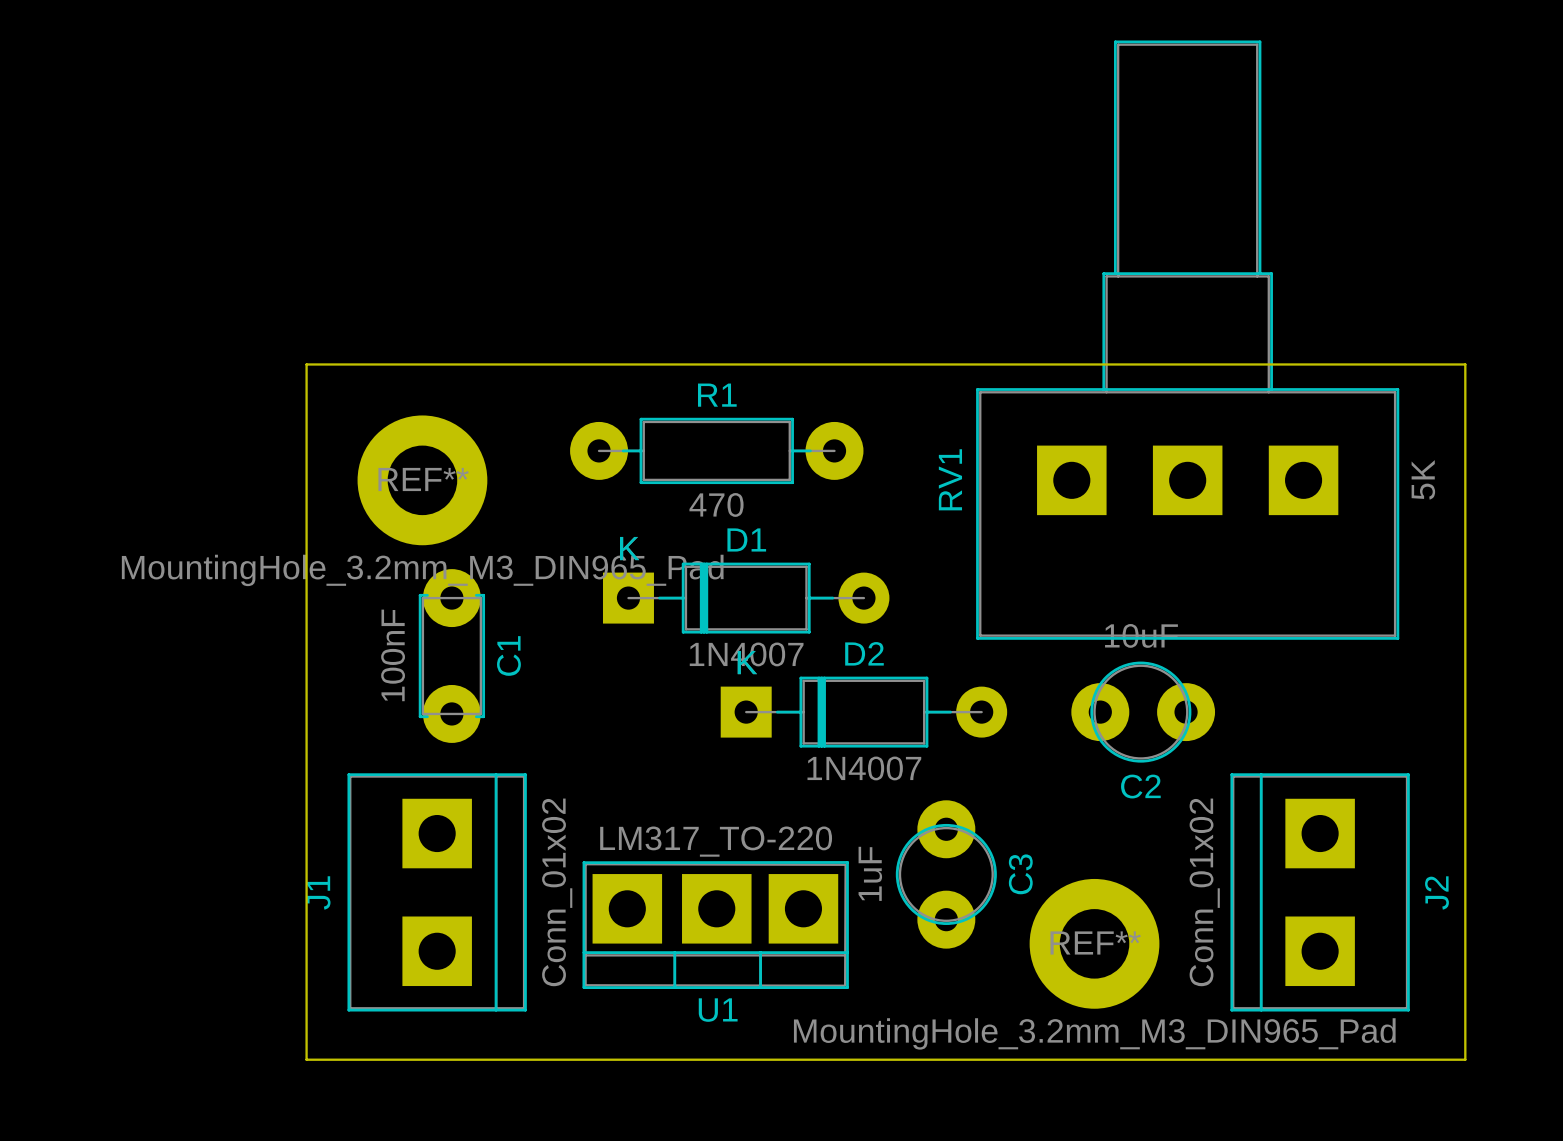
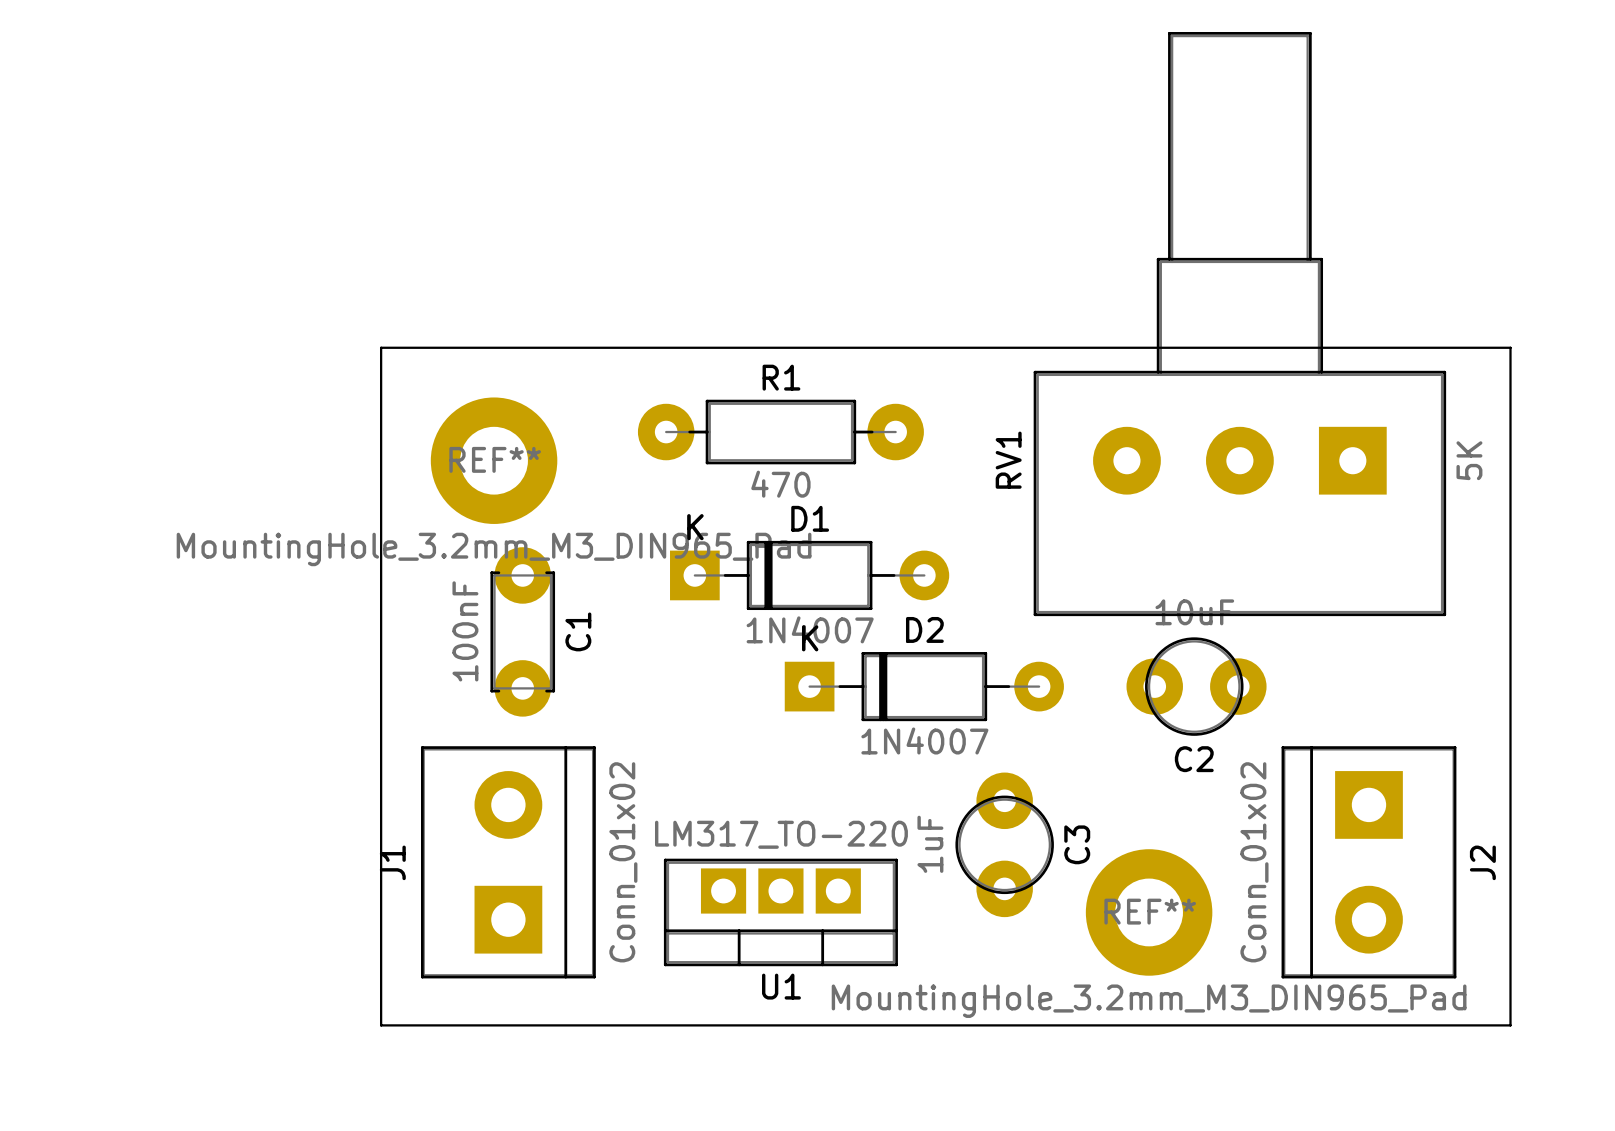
RV1 footprint: [976, 40, 1400, 640] -> [1033, 32, 1447, 617]
J1 footprint: [347, 773, 527, 1012] -> [420, 746, 596, 979]
J2 footprint: [1230, 773, 1410, 1012] -> [1281, 746, 1457, 979]
U1 footprint: [582, 861, 849, 989] -> [663, 858, 898, 967]

